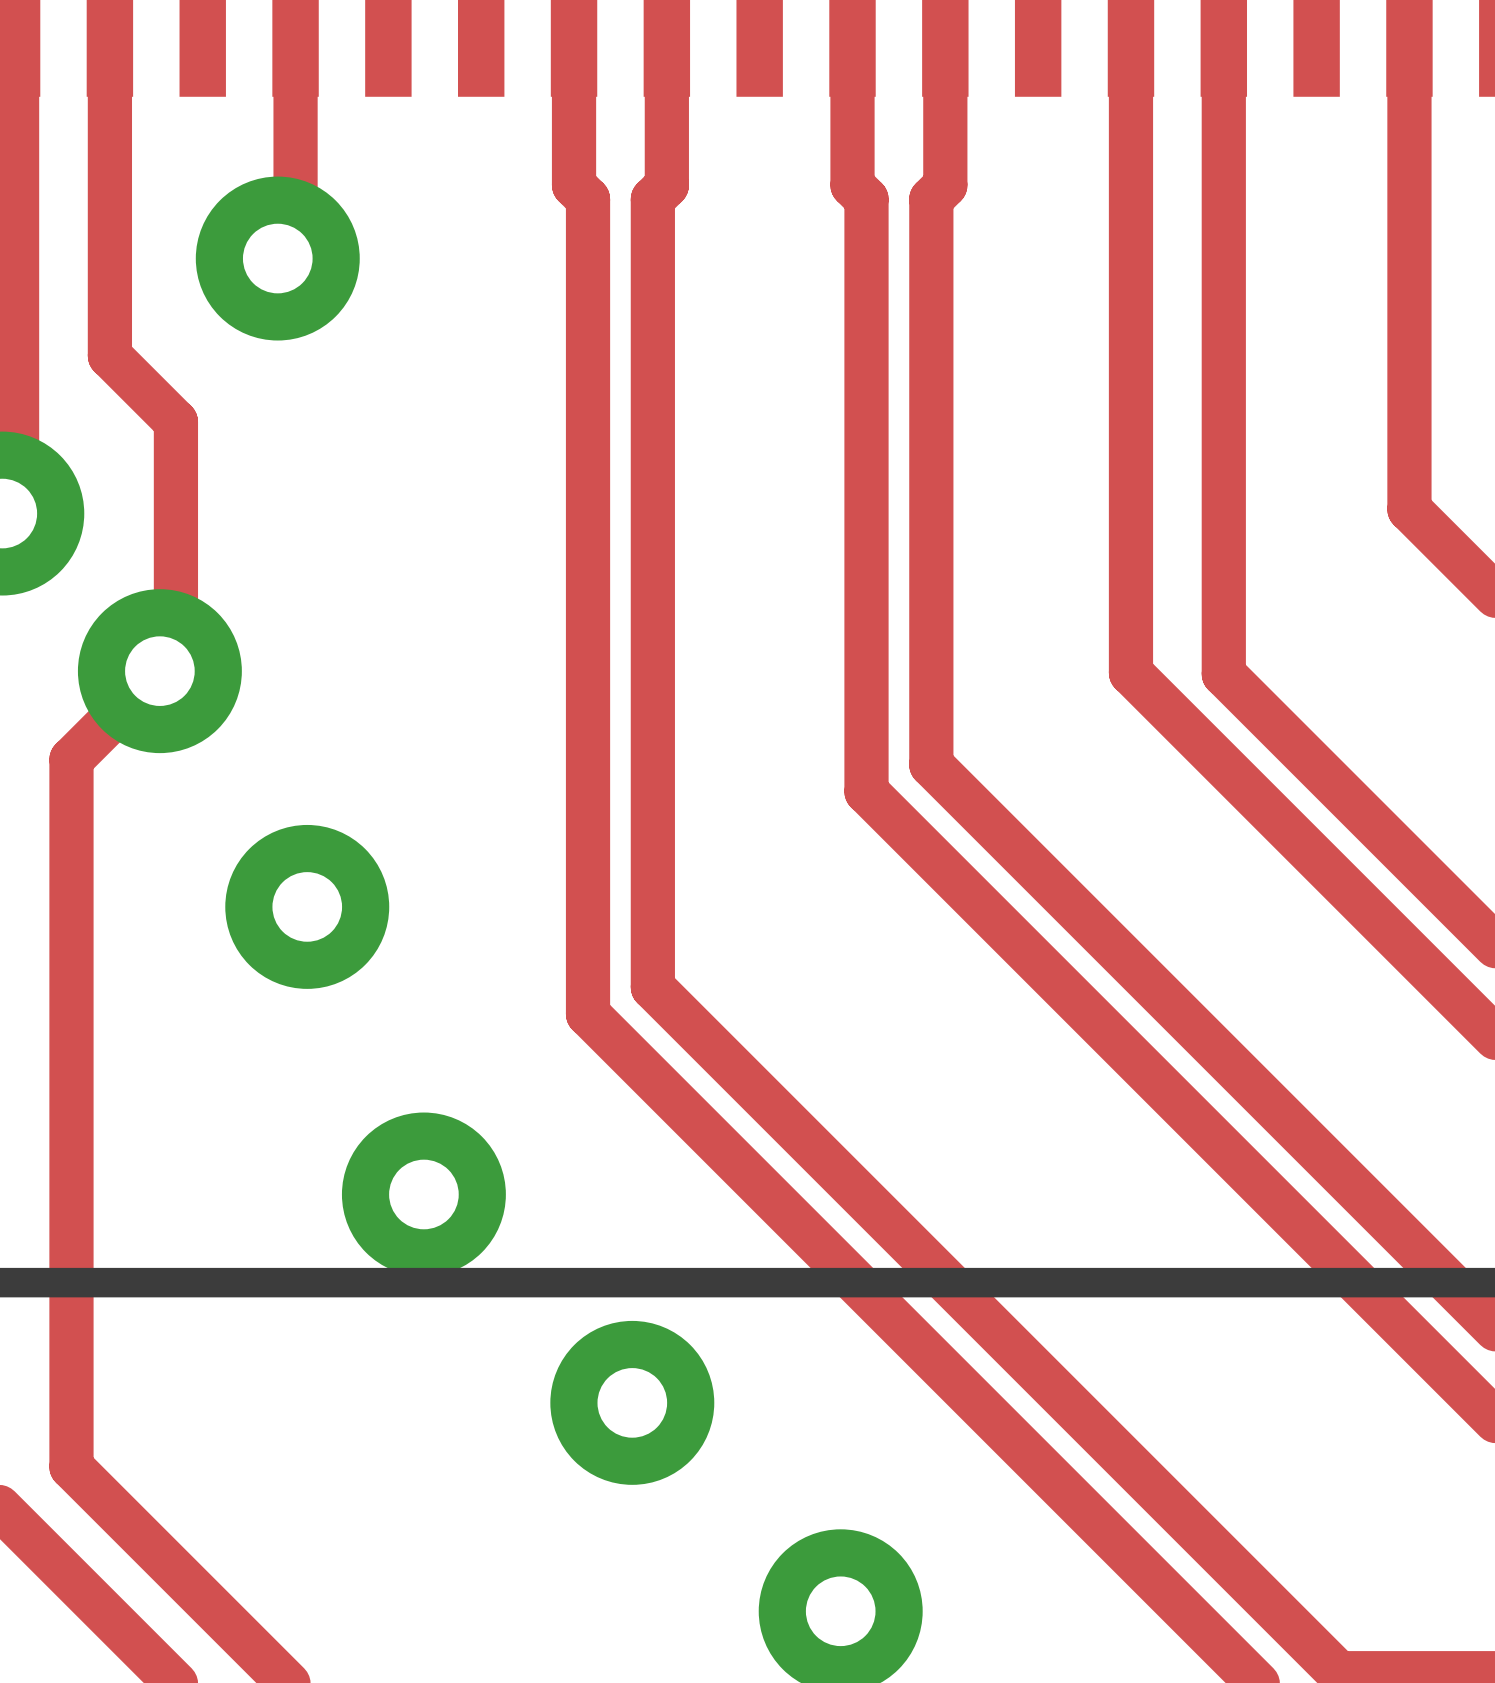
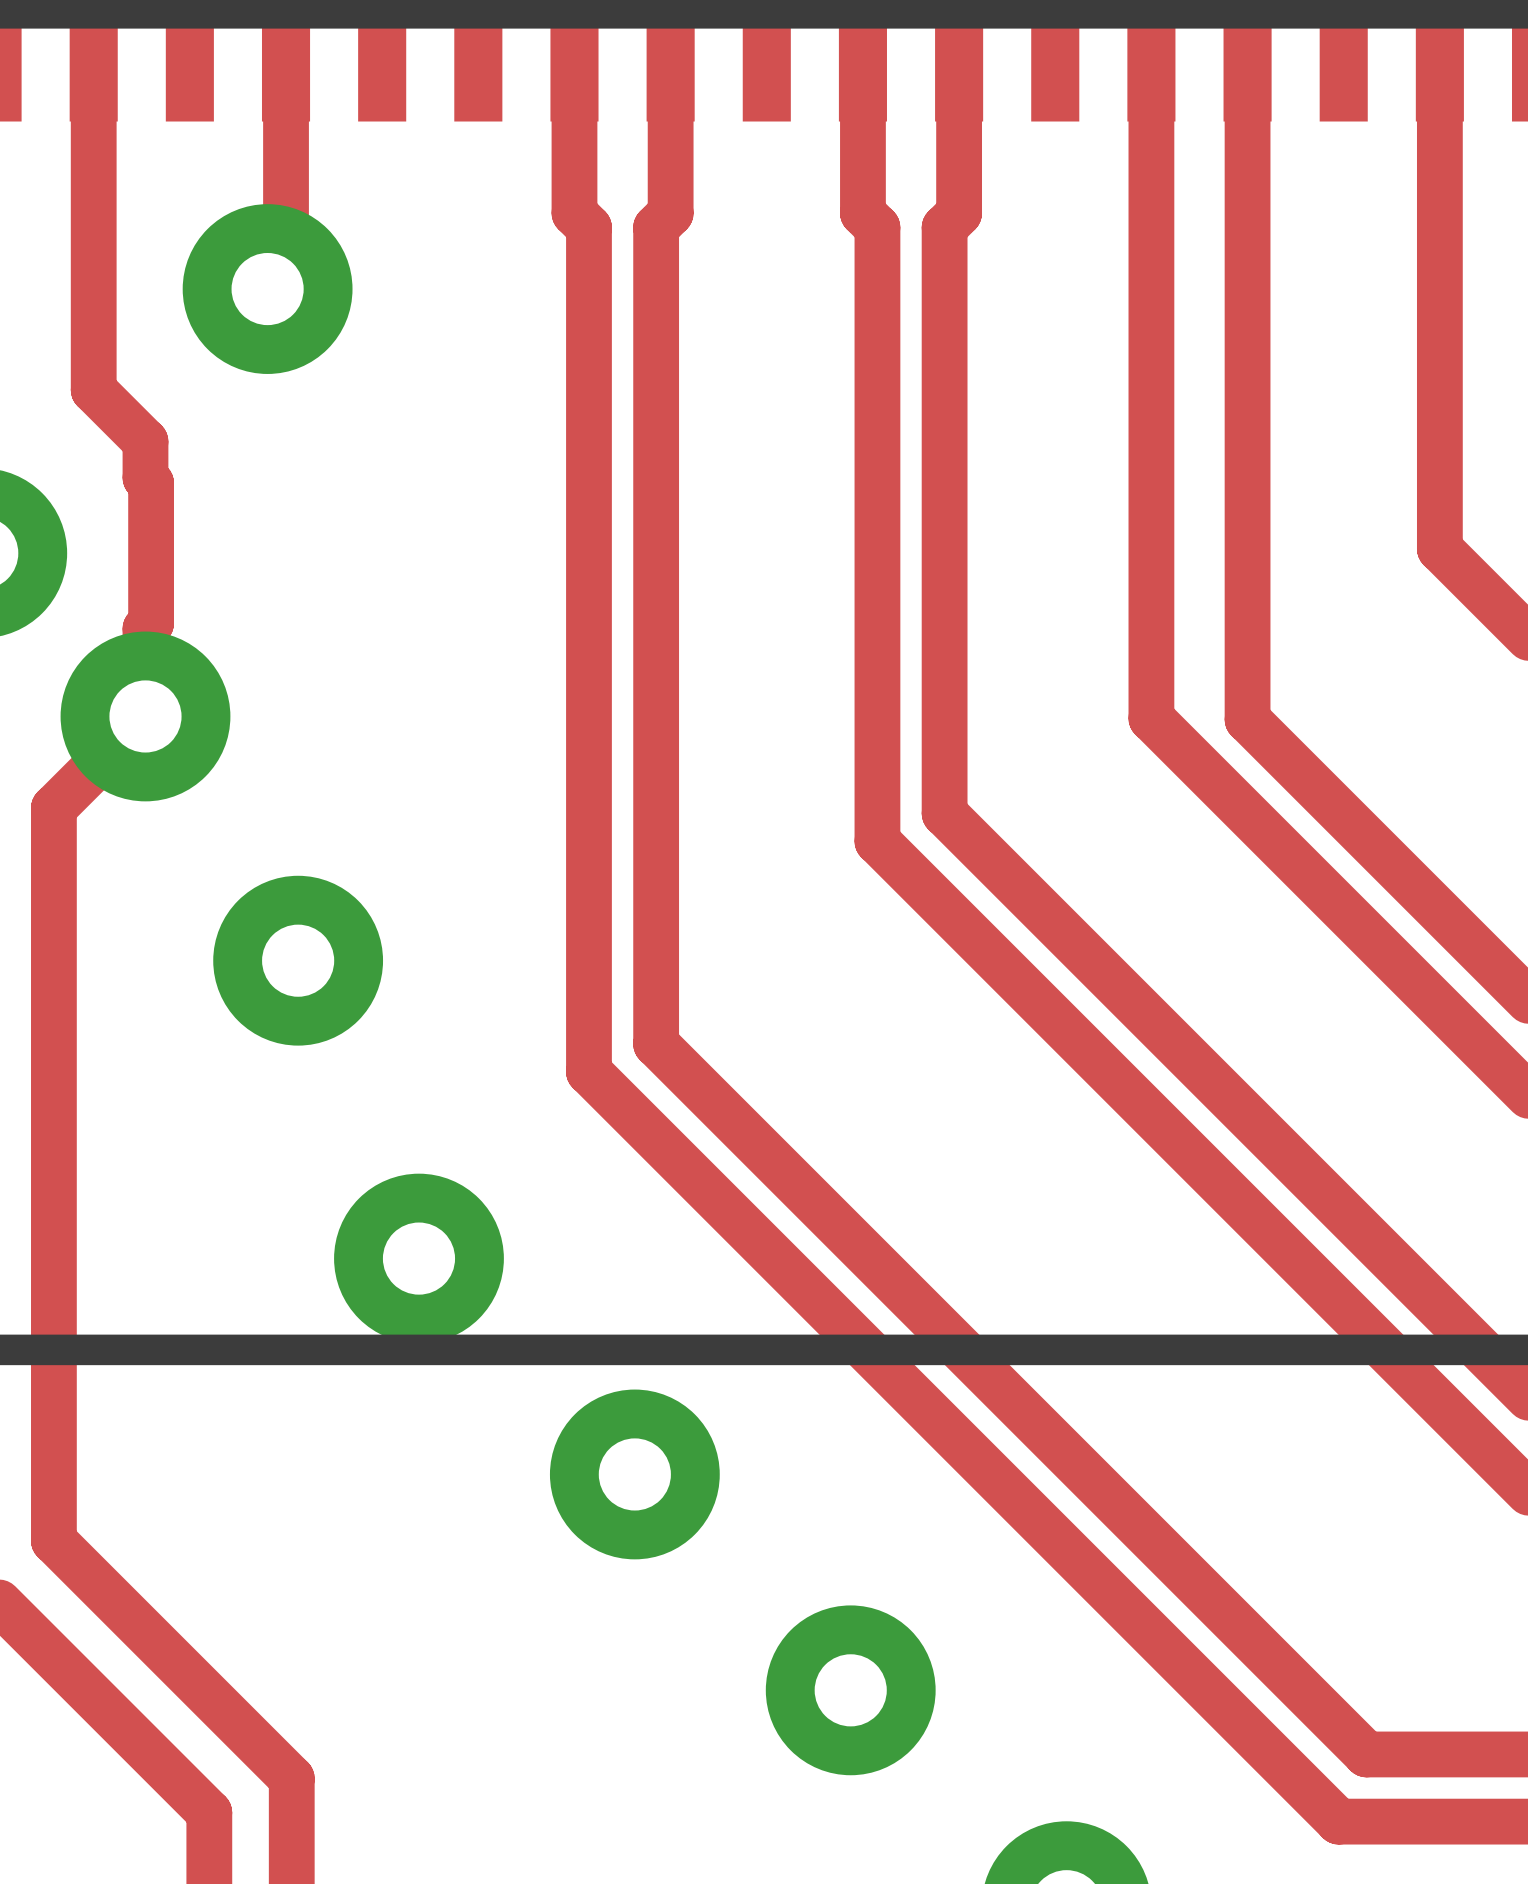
top track: (159, 405) (175, 421) (175, 655) (159, 671) -> (145, 441) (145, 477) (151, 483) (151, 623) (145, 628) (145, 716)

